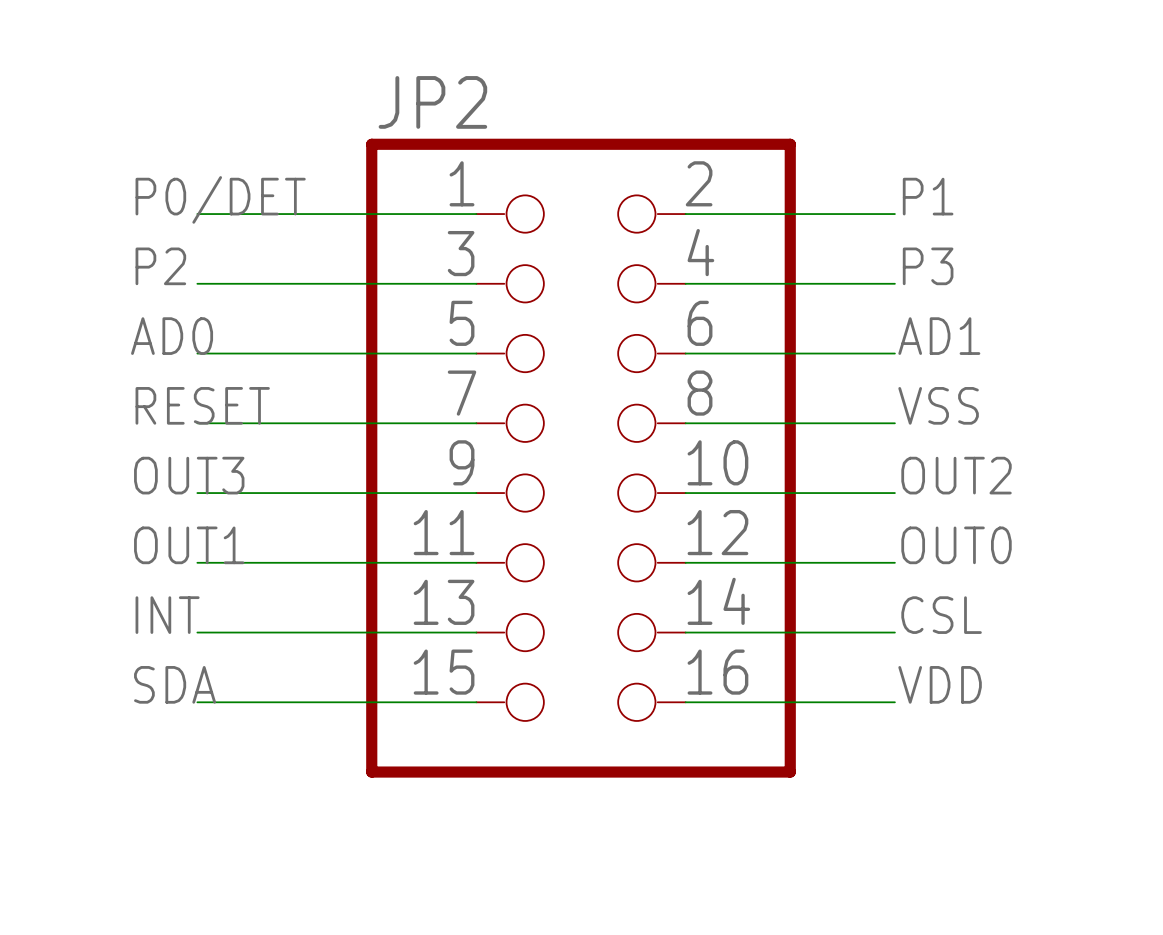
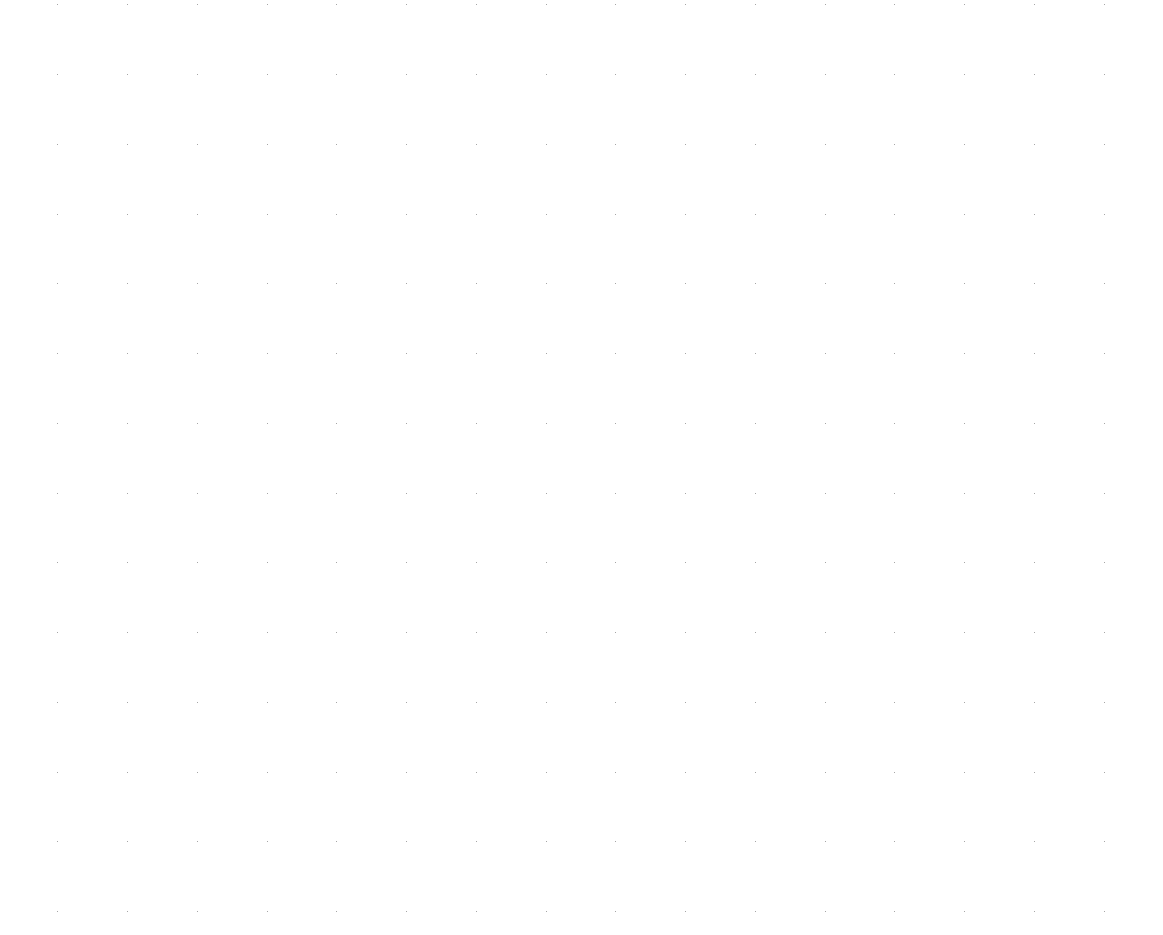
label: P1 (928, 196) -> none
label: P0/DET (220, 199) -> none
wire: (197, 214) (476, 214) -> none
wire: (685, 214) (894, 214) -> none
label: P2 (160, 266) -> none
label: P3 (928, 266) -> none
wire: (197, 283) (476, 283) -> none
wire: (685, 283) (894, 283) -> none
label: AD0 (172, 336) -> none
label: AD1 (939, 336) -> none
wire: (197, 353) (476, 353) -> none
wire: (685, 353) (894, 353) -> none
label: RESET (202, 405) -> none
label: VSS (938, 405) -> none
wire: (197, 423) (476, 423) -> none
wire: (685, 423) (894, 423) -> none
JP2: (581, 458) -> none
label: OUT3 (189, 475) -> none
label: OUT2 (956, 475) -> none
wire: (197, 493) (476, 493) -> none
wire: (685, 493) (894, 493) -> none
label: OUT1 (189, 545) -> none
label: OUT0 (956, 545) -> none
wire: (197, 562) (476, 562) -> none
wire: (685, 562) (894, 562) -> none
label: INT (167, 615) -> none
label: CSL (941, 615) -> none
wire: (197, 632) (476, 632) -> none
wire: (685, 632) (894, 632) -> none
label: SDA (175, 684) -> none
label: VDD (940, 684) -> none
wire: (197, 702) (476, 702) -> none
wire: (685, 702) (894, 702) -> none

